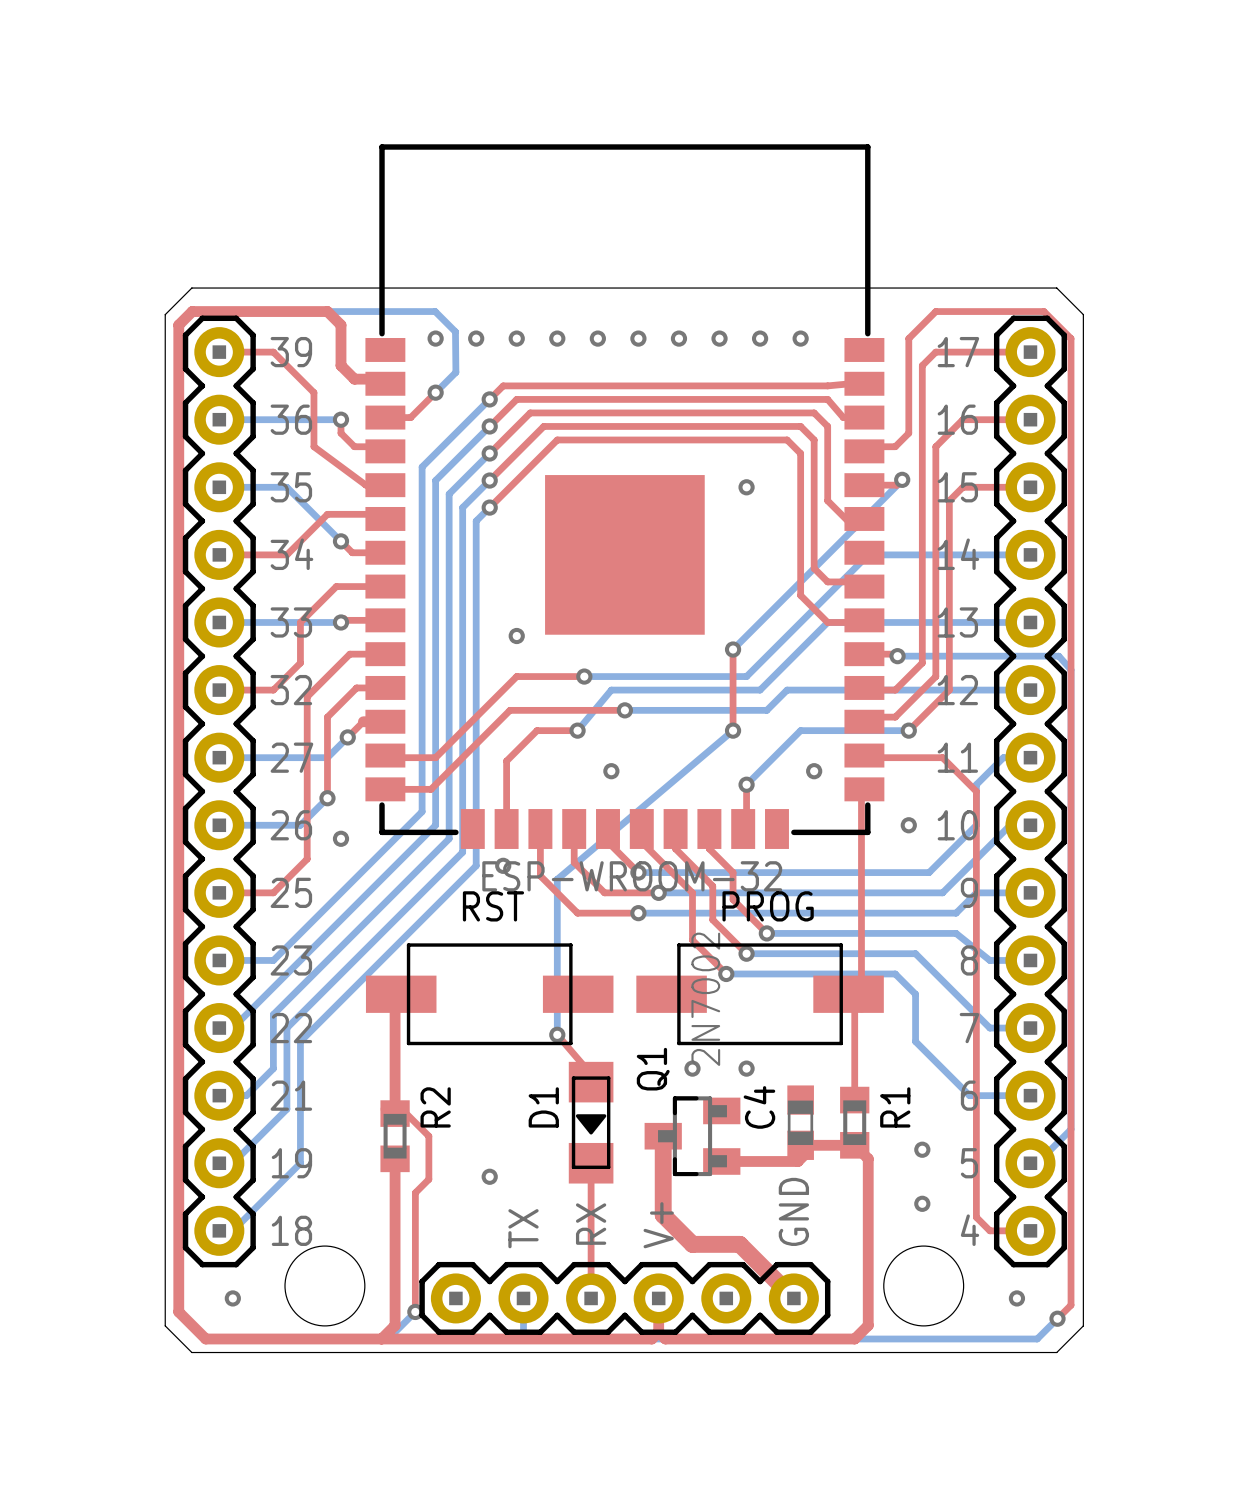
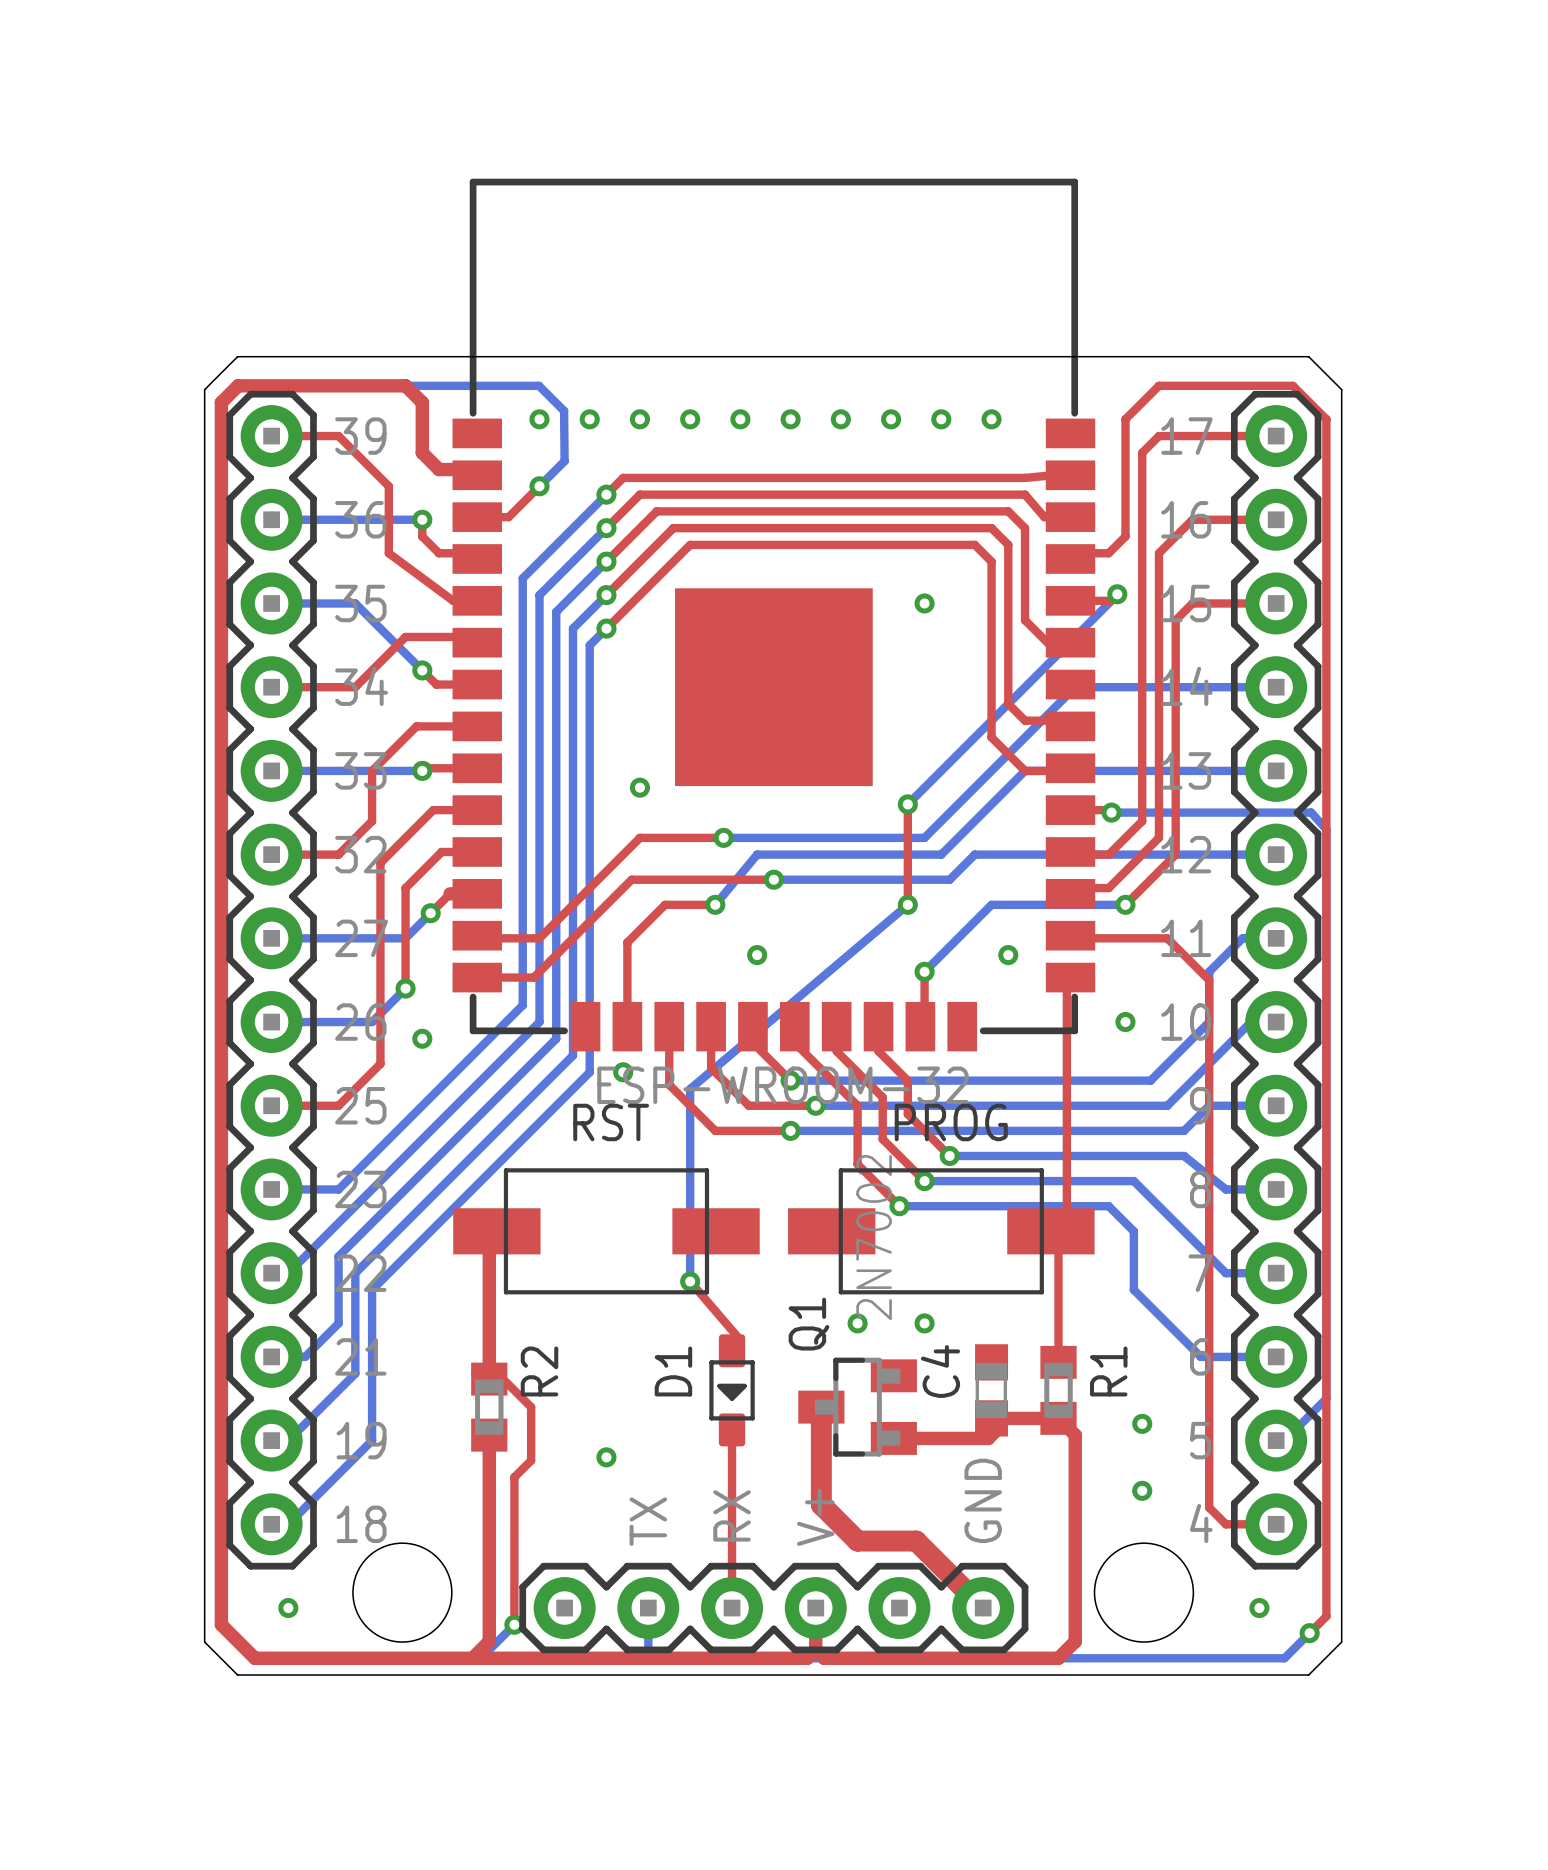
D1 footprint: [568, 1061, 614, 1184] -> [709, 1334, 755, 1447]

